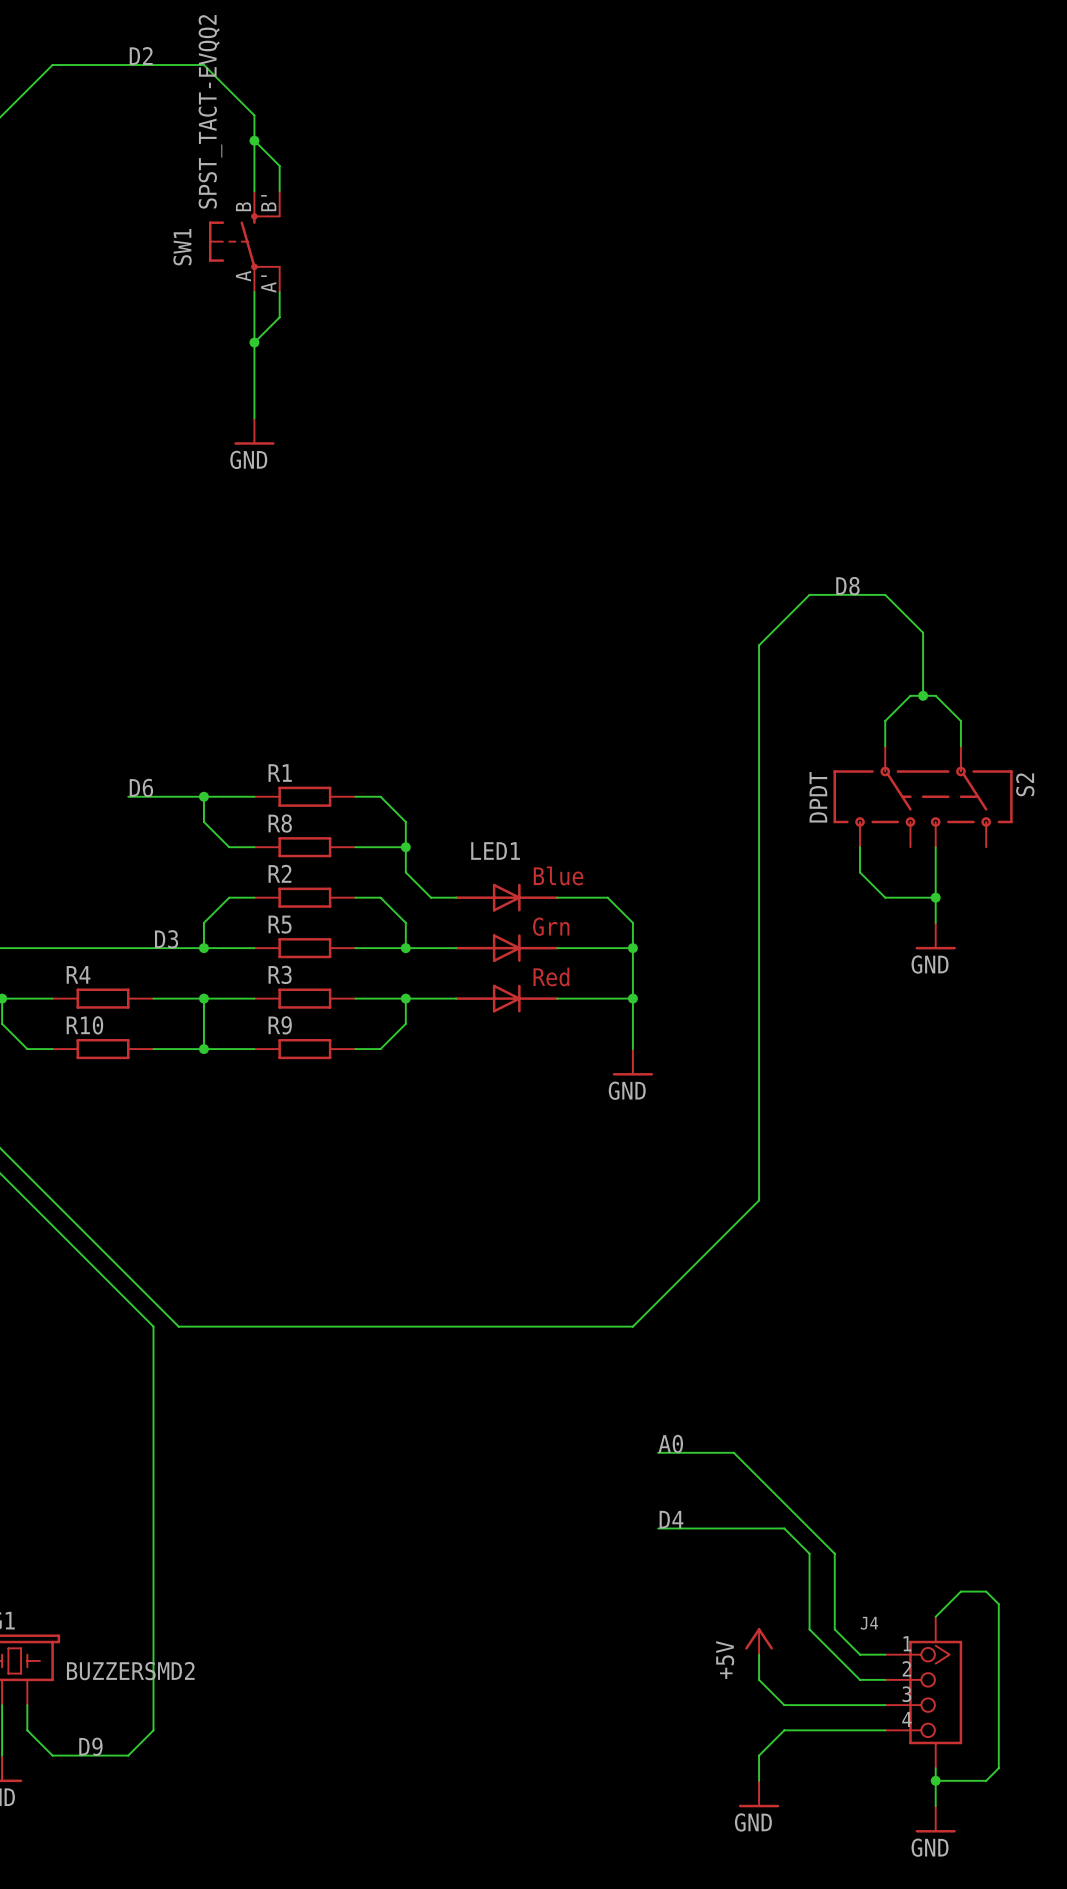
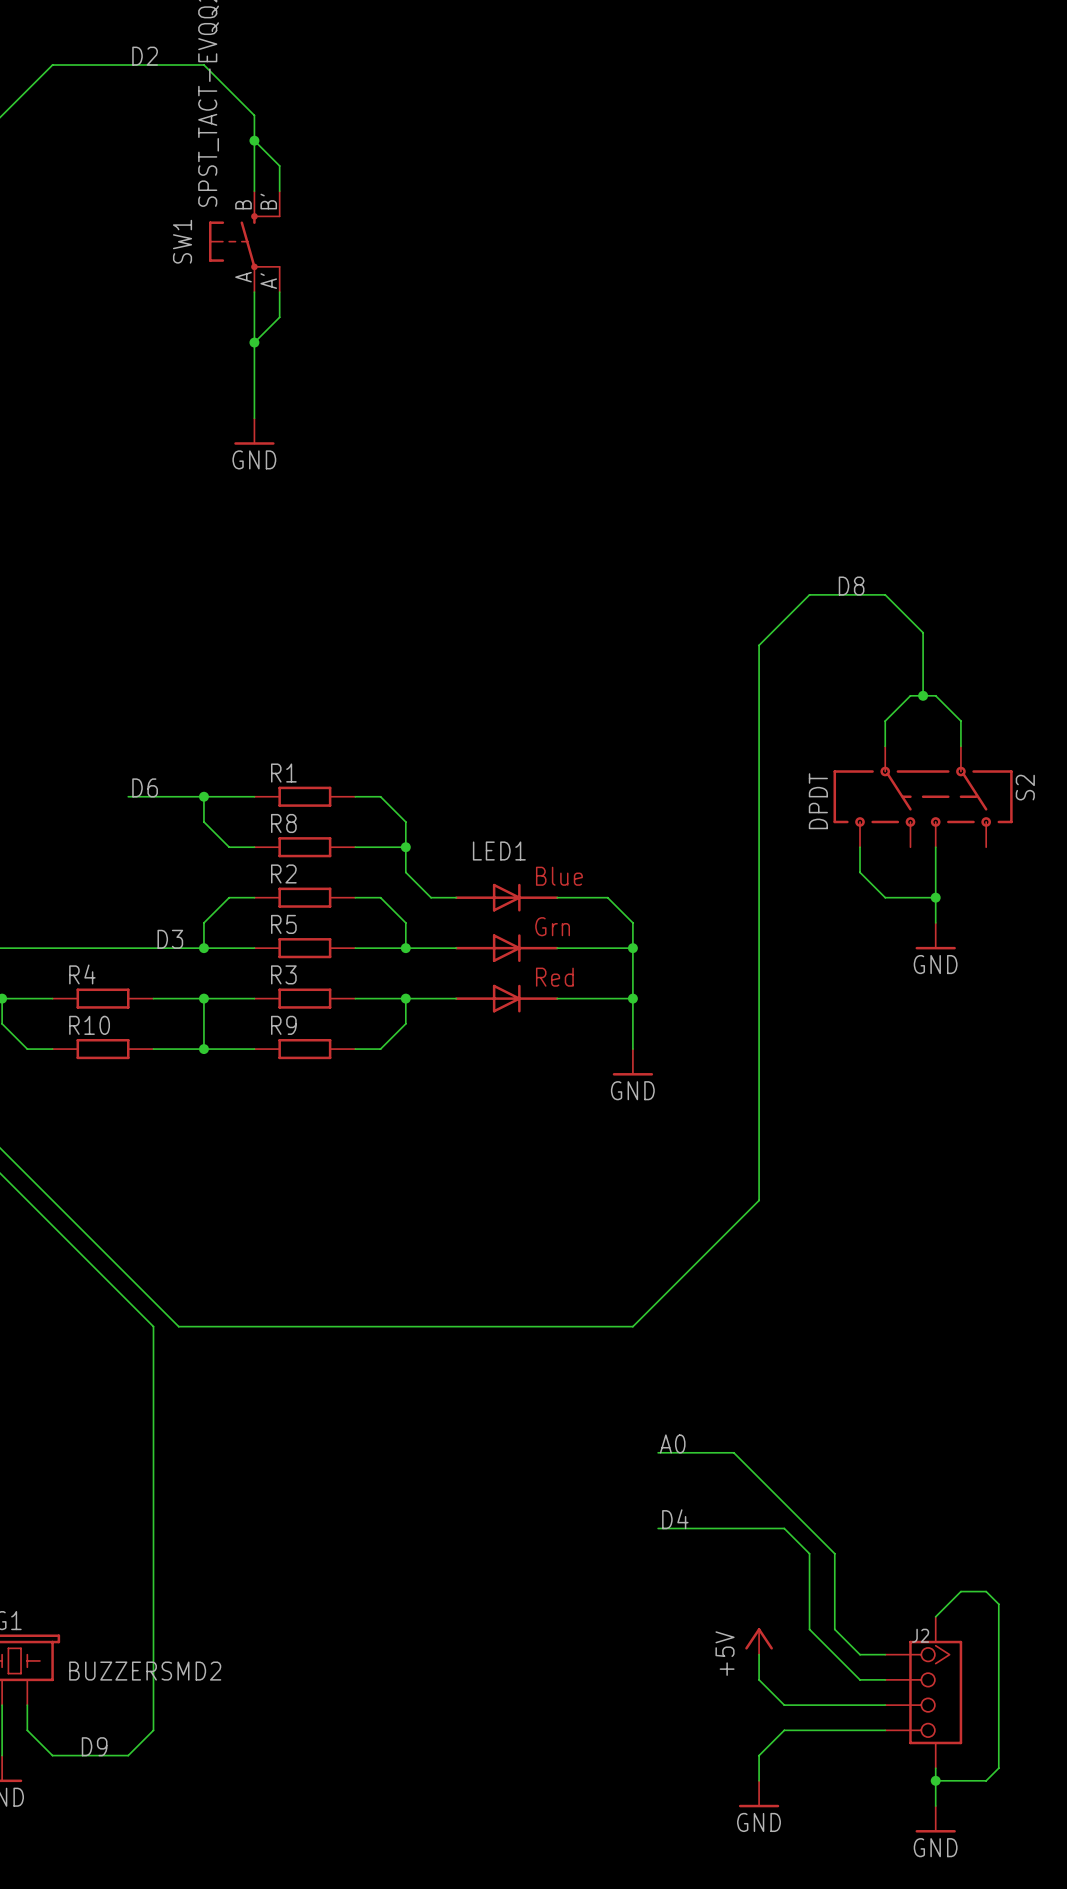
J4 name: J4 (869, 1623) -> J2 (920, 1635)
J4 pin number: 1 (907, 1643) -> none
J4 pin number: 2 (906, 1668) -> none
J4 pin number: 3 (906, 1694) -> none
J4 pin number: 4 (906, 1719) -> none

